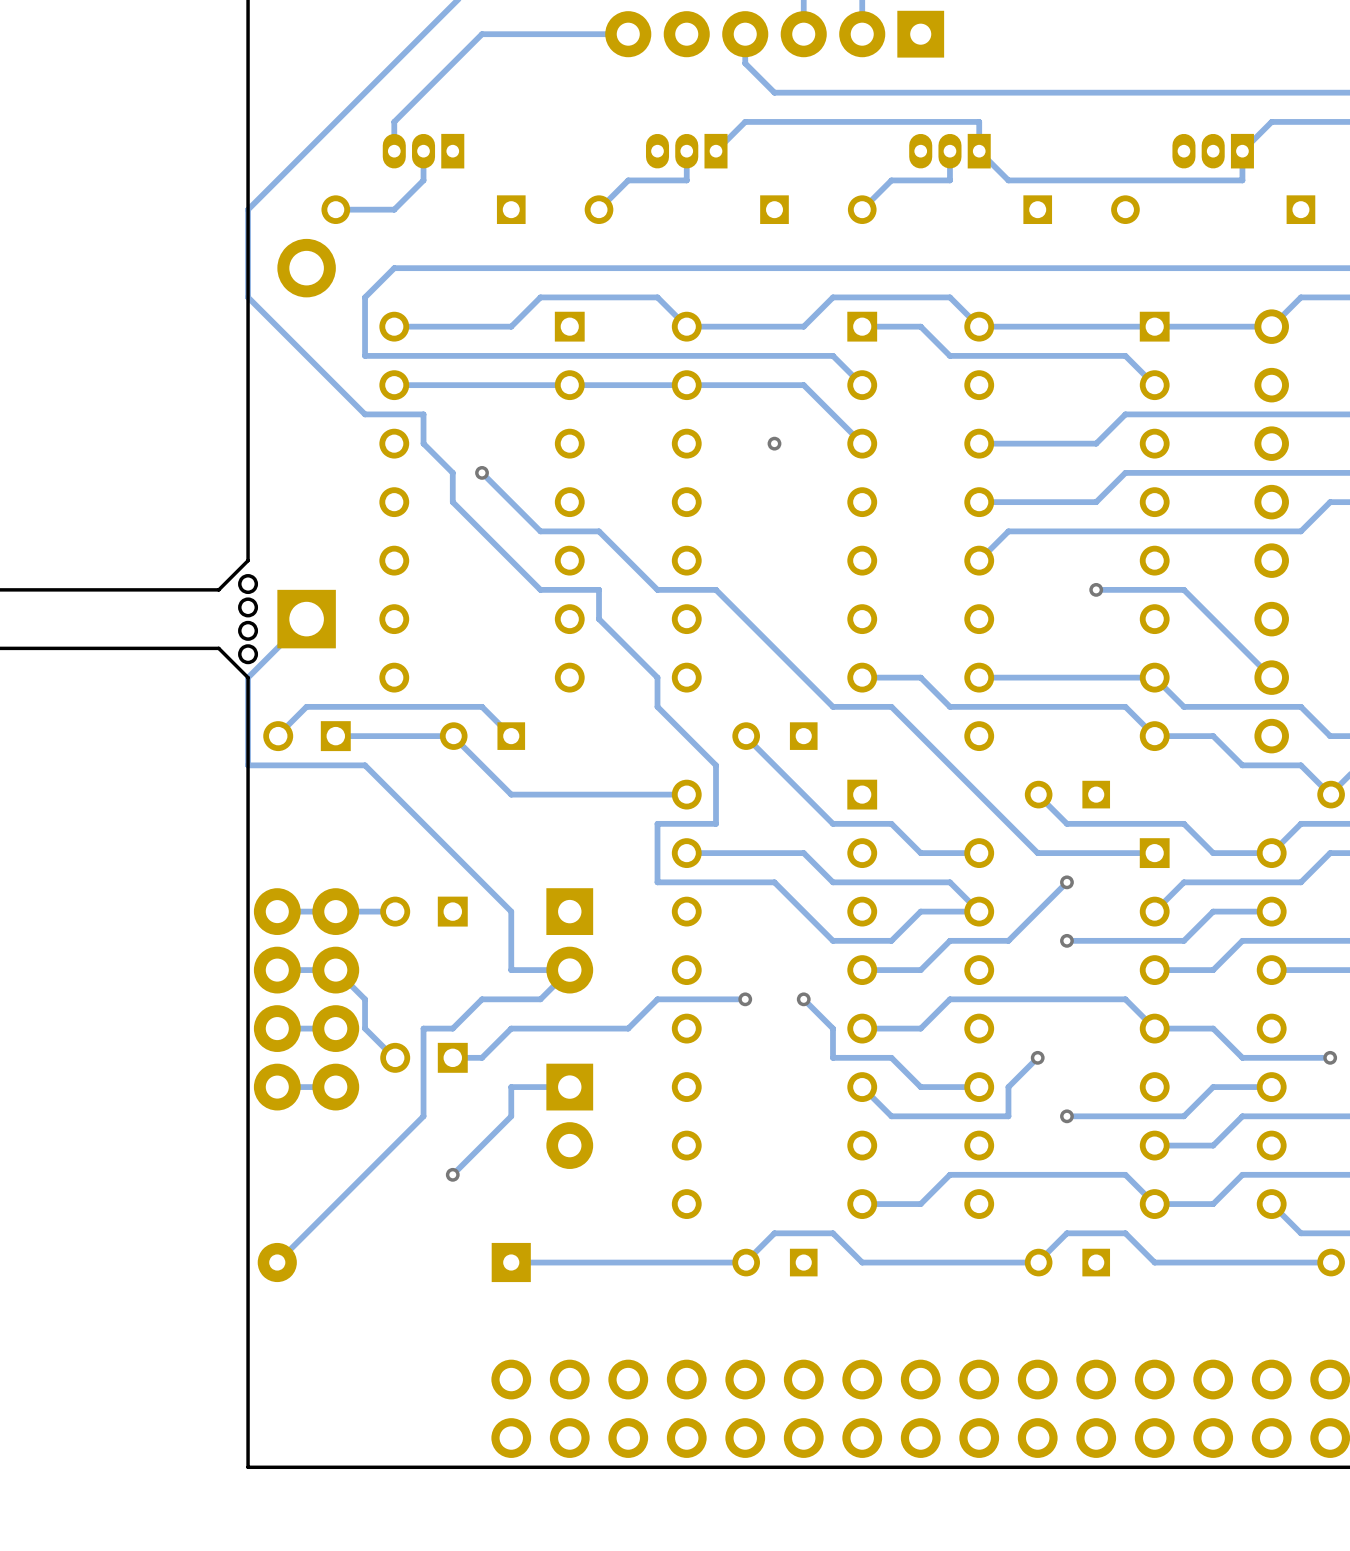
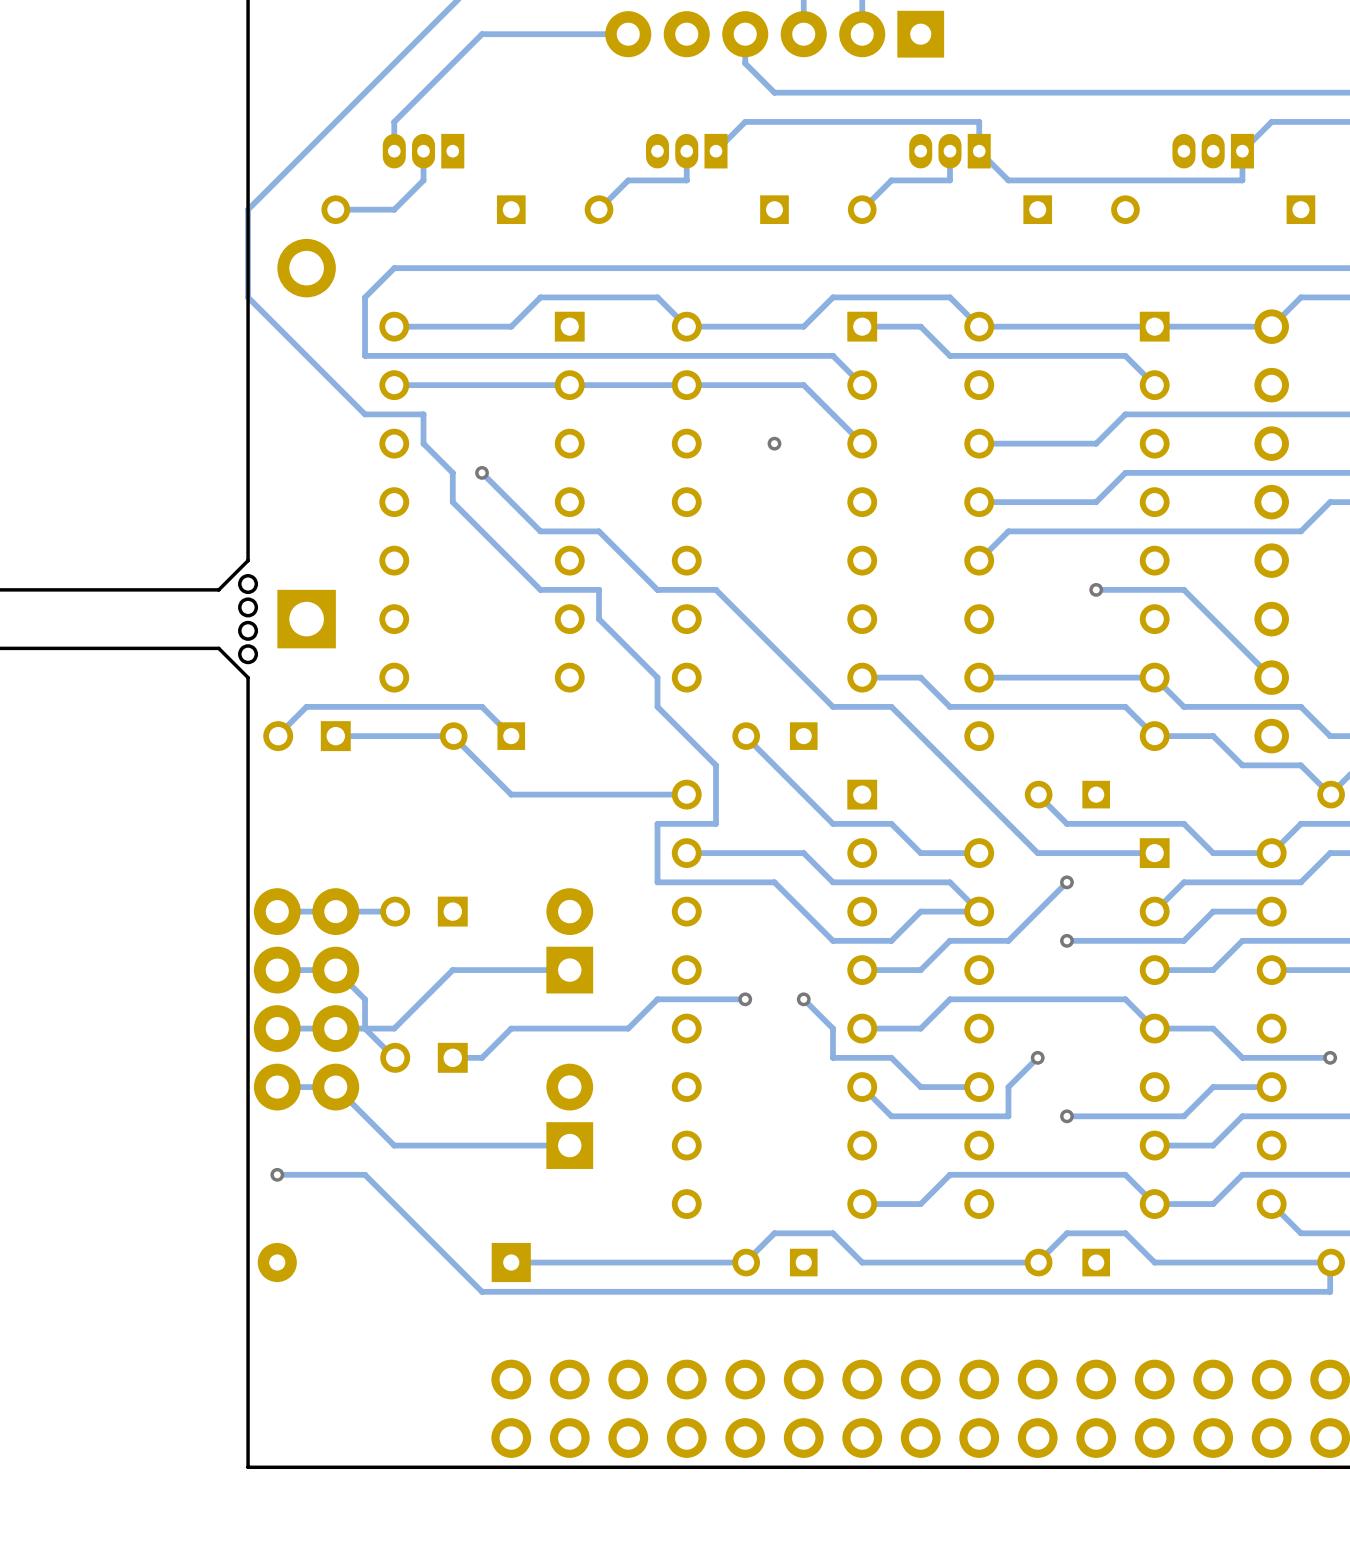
track: (306, 619) (248, 677) (248, 765) (365, 765) (511, 911) (511, 970) -> (335, 1028) (394, 1028) (452, 970) (511, 970)
part rotation: 0° (569, 940) -> 180° (569, 940)
track: (569, 970) (540, 999) (482, 999) (452, 1028) (423, 1028) (423, 1116) (277, 1262) -> none
track: none -> (335, 1087) (394, 1145) (569, 1145)
track: (569, 1087) (511, 1087) (511, 1116) (452, 1174) -> none
part rotation: 0° (569, 1116) -> 180° (569, 1116)
track: none -> (277, 1174) (365, 1174) (482, 1291) (1330, 1291) (1330, 1262)
via: none -> (277, 1174)
via: (452, 1174) -> none

